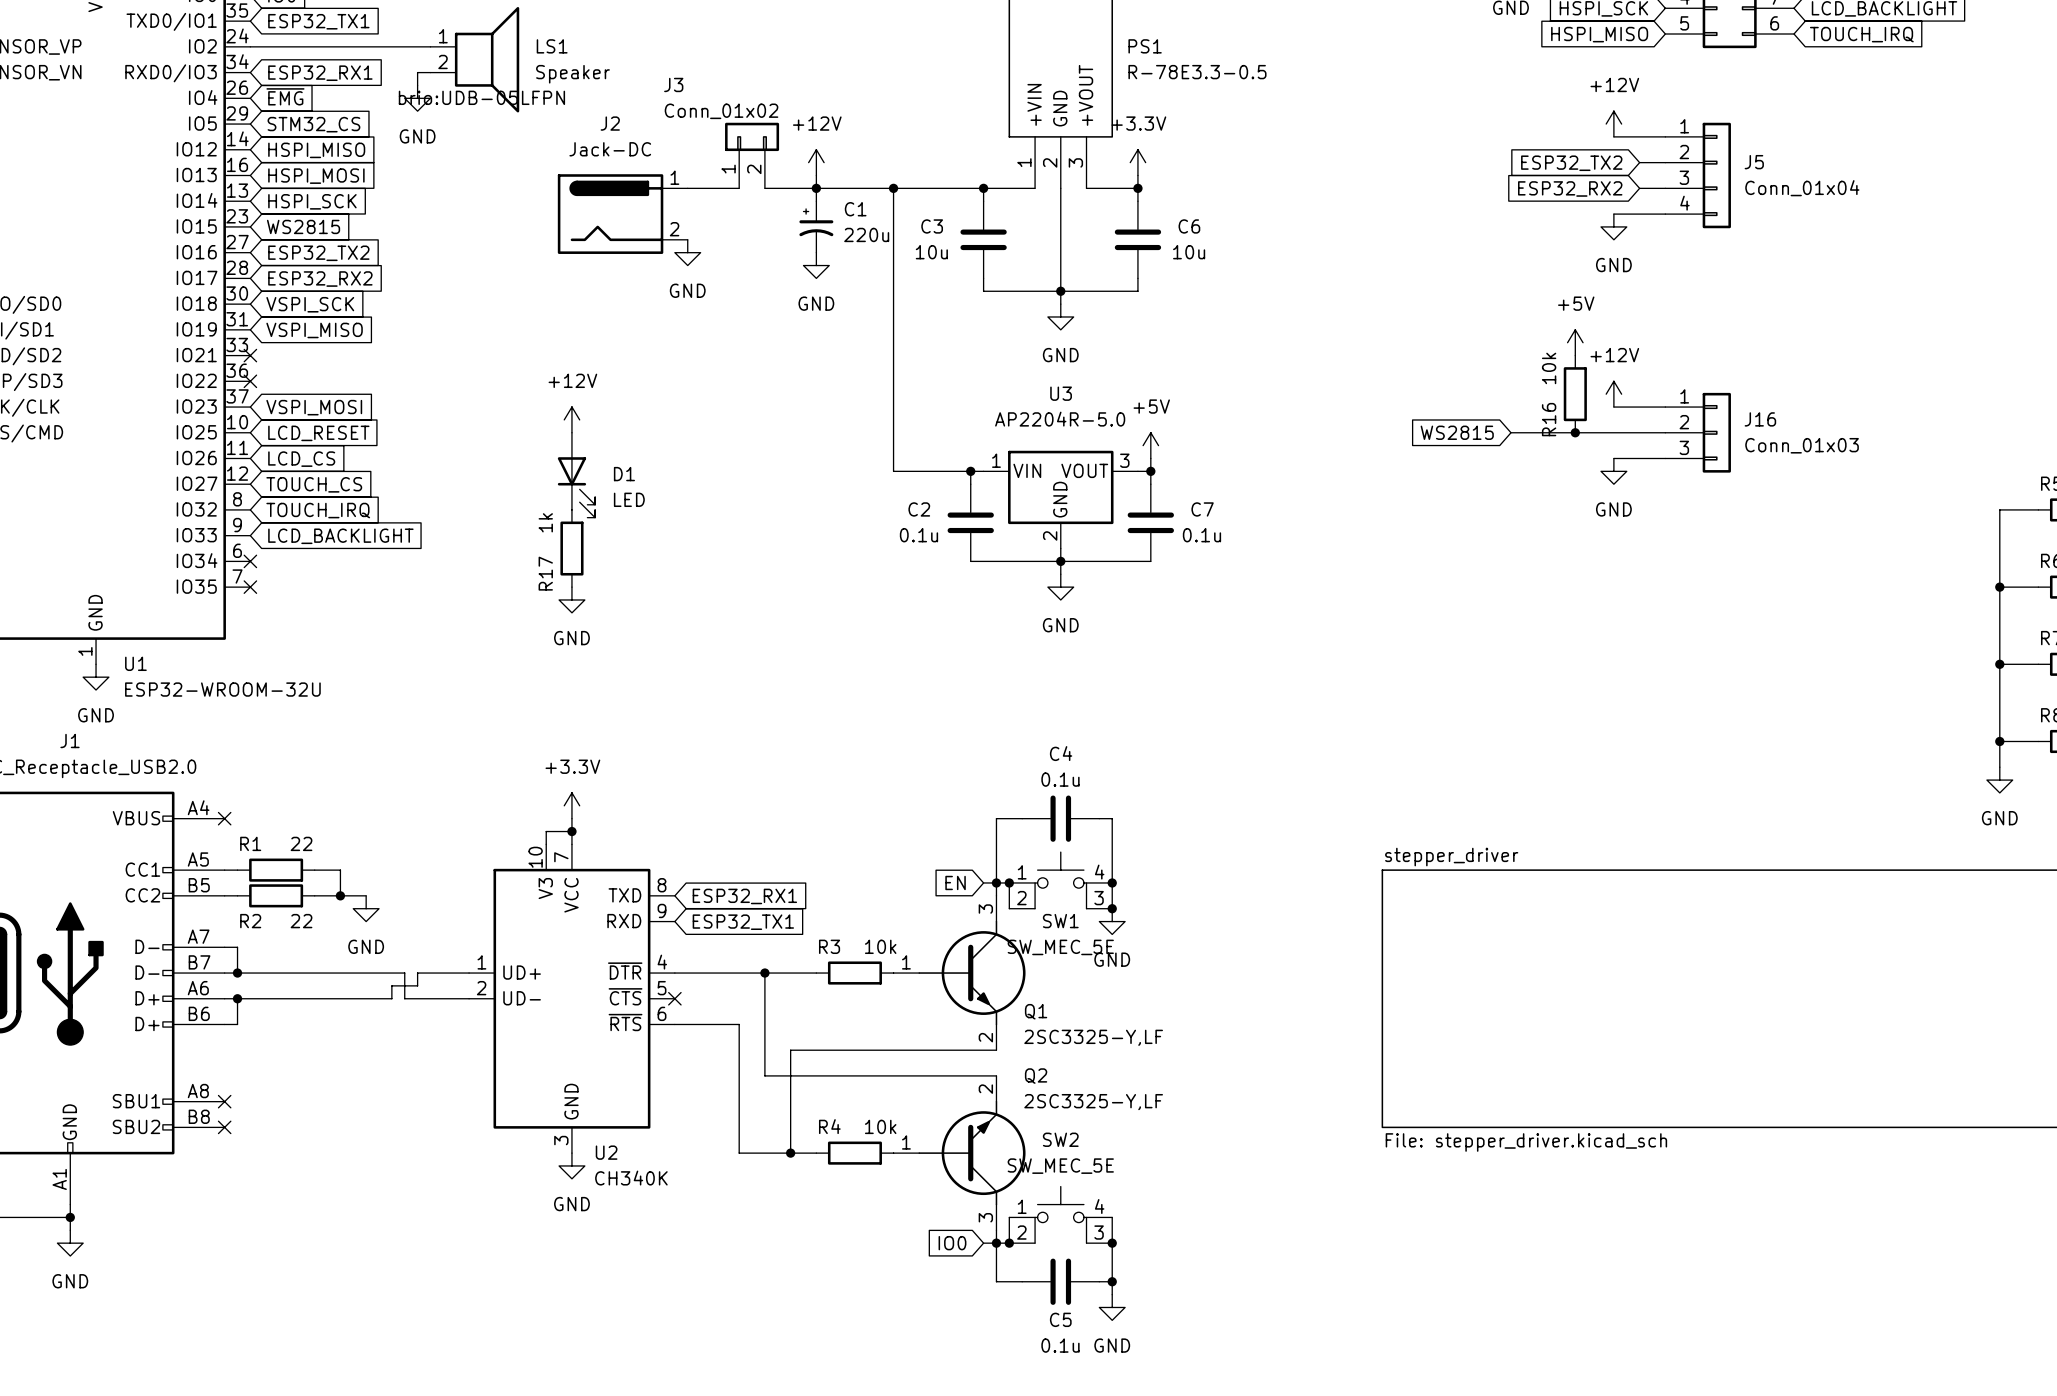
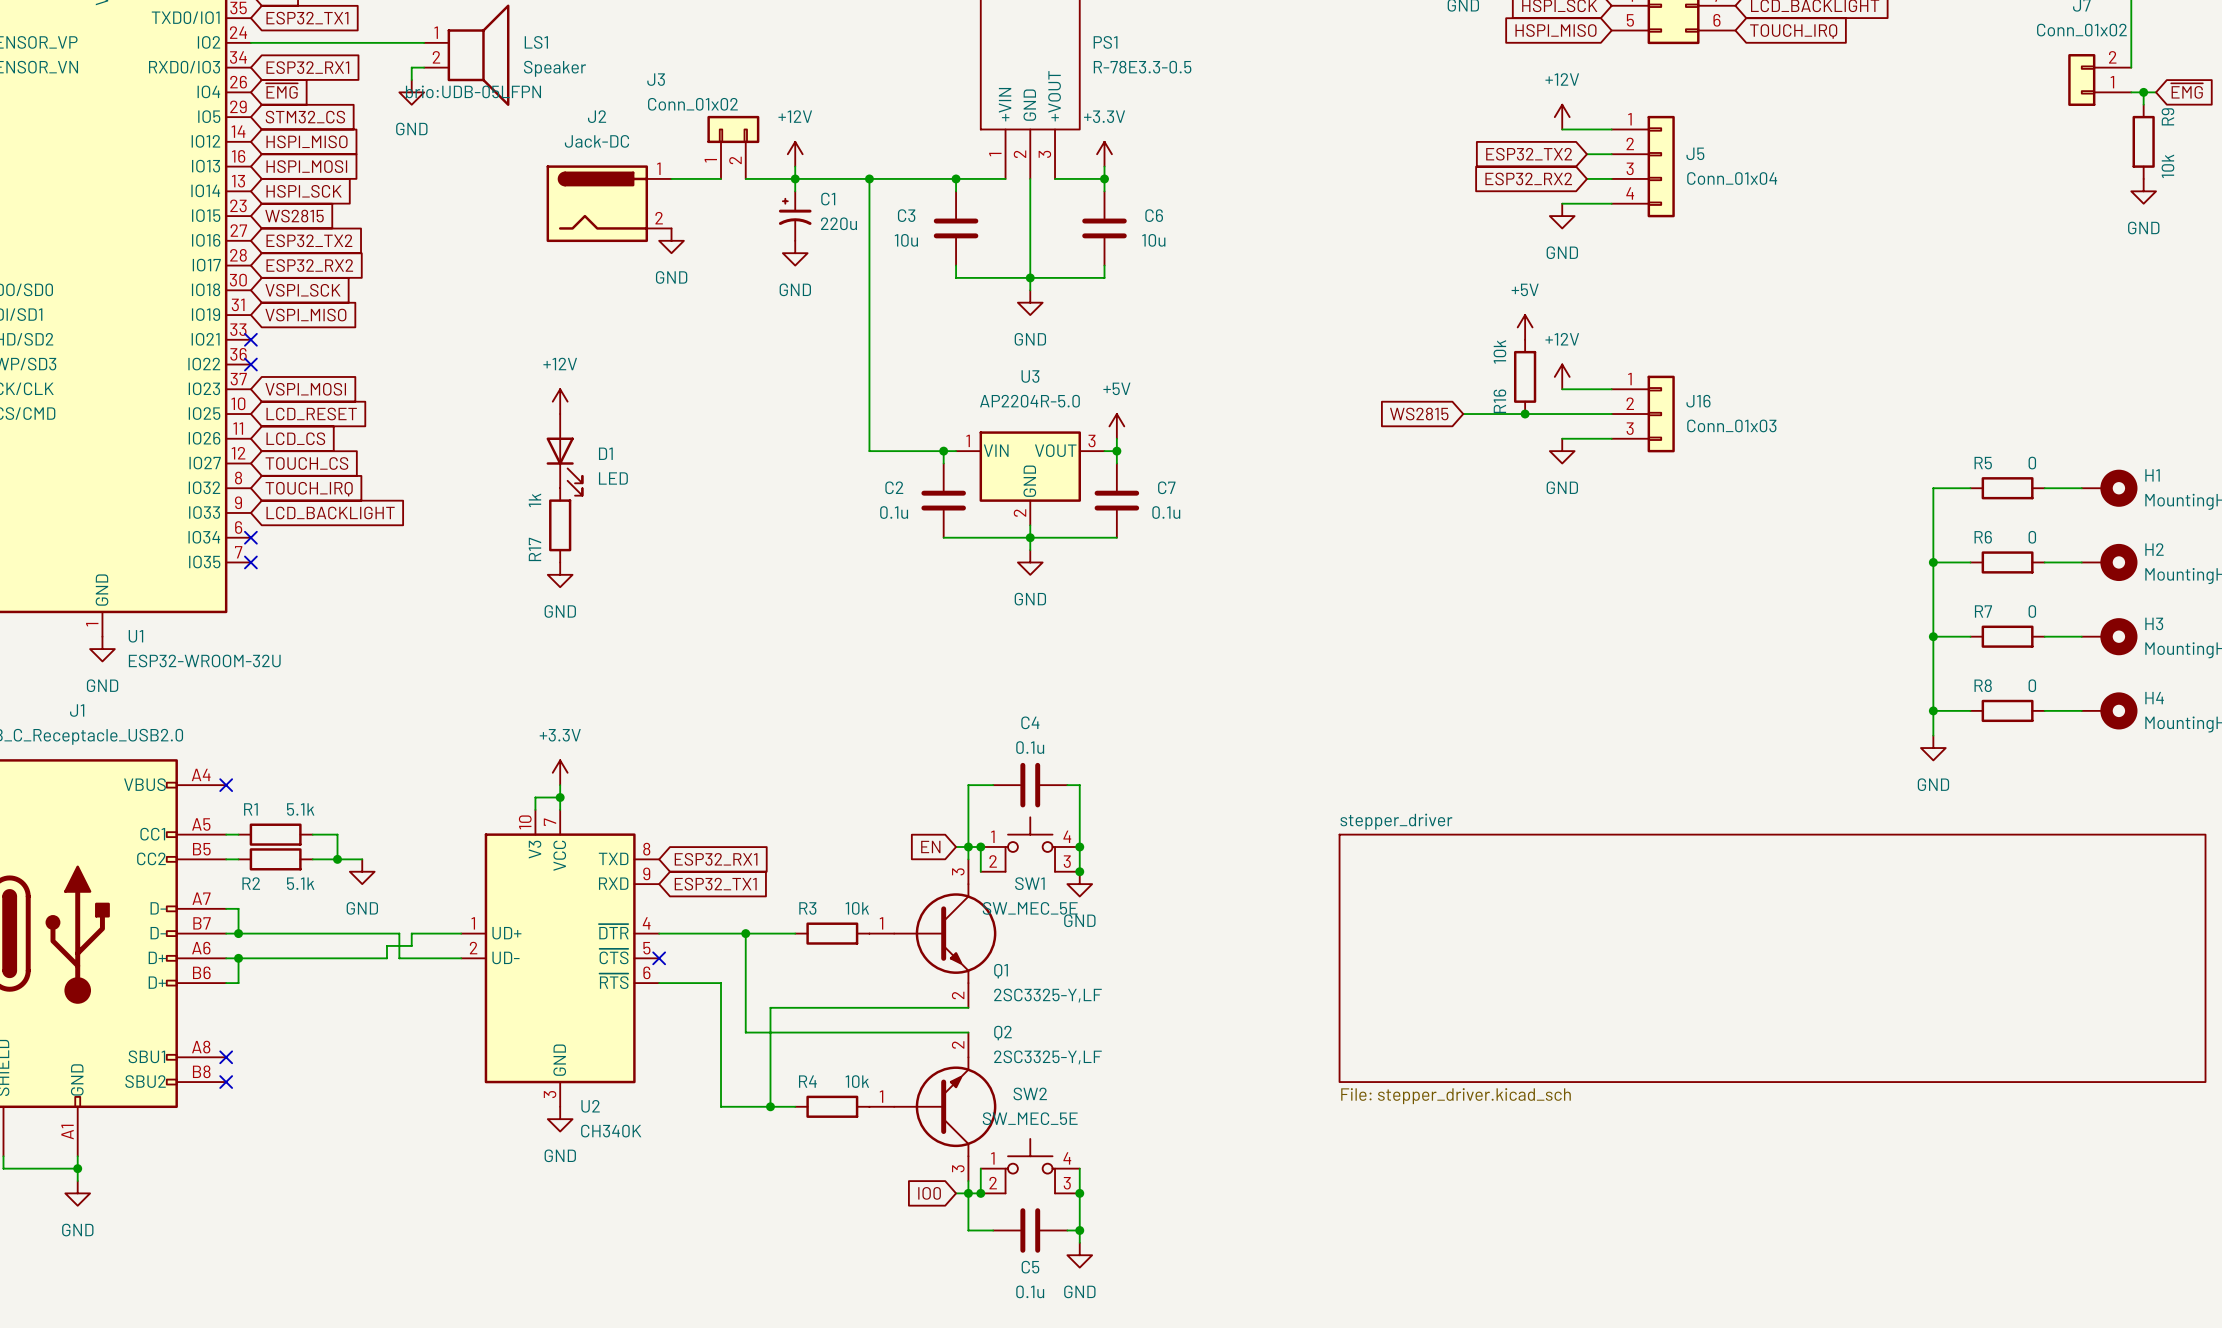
R1 value: 22 (301, 843) -> 5.1k (300, 809)
R2 value: 22 (301, 921) -> 5.1k (300, 883)

